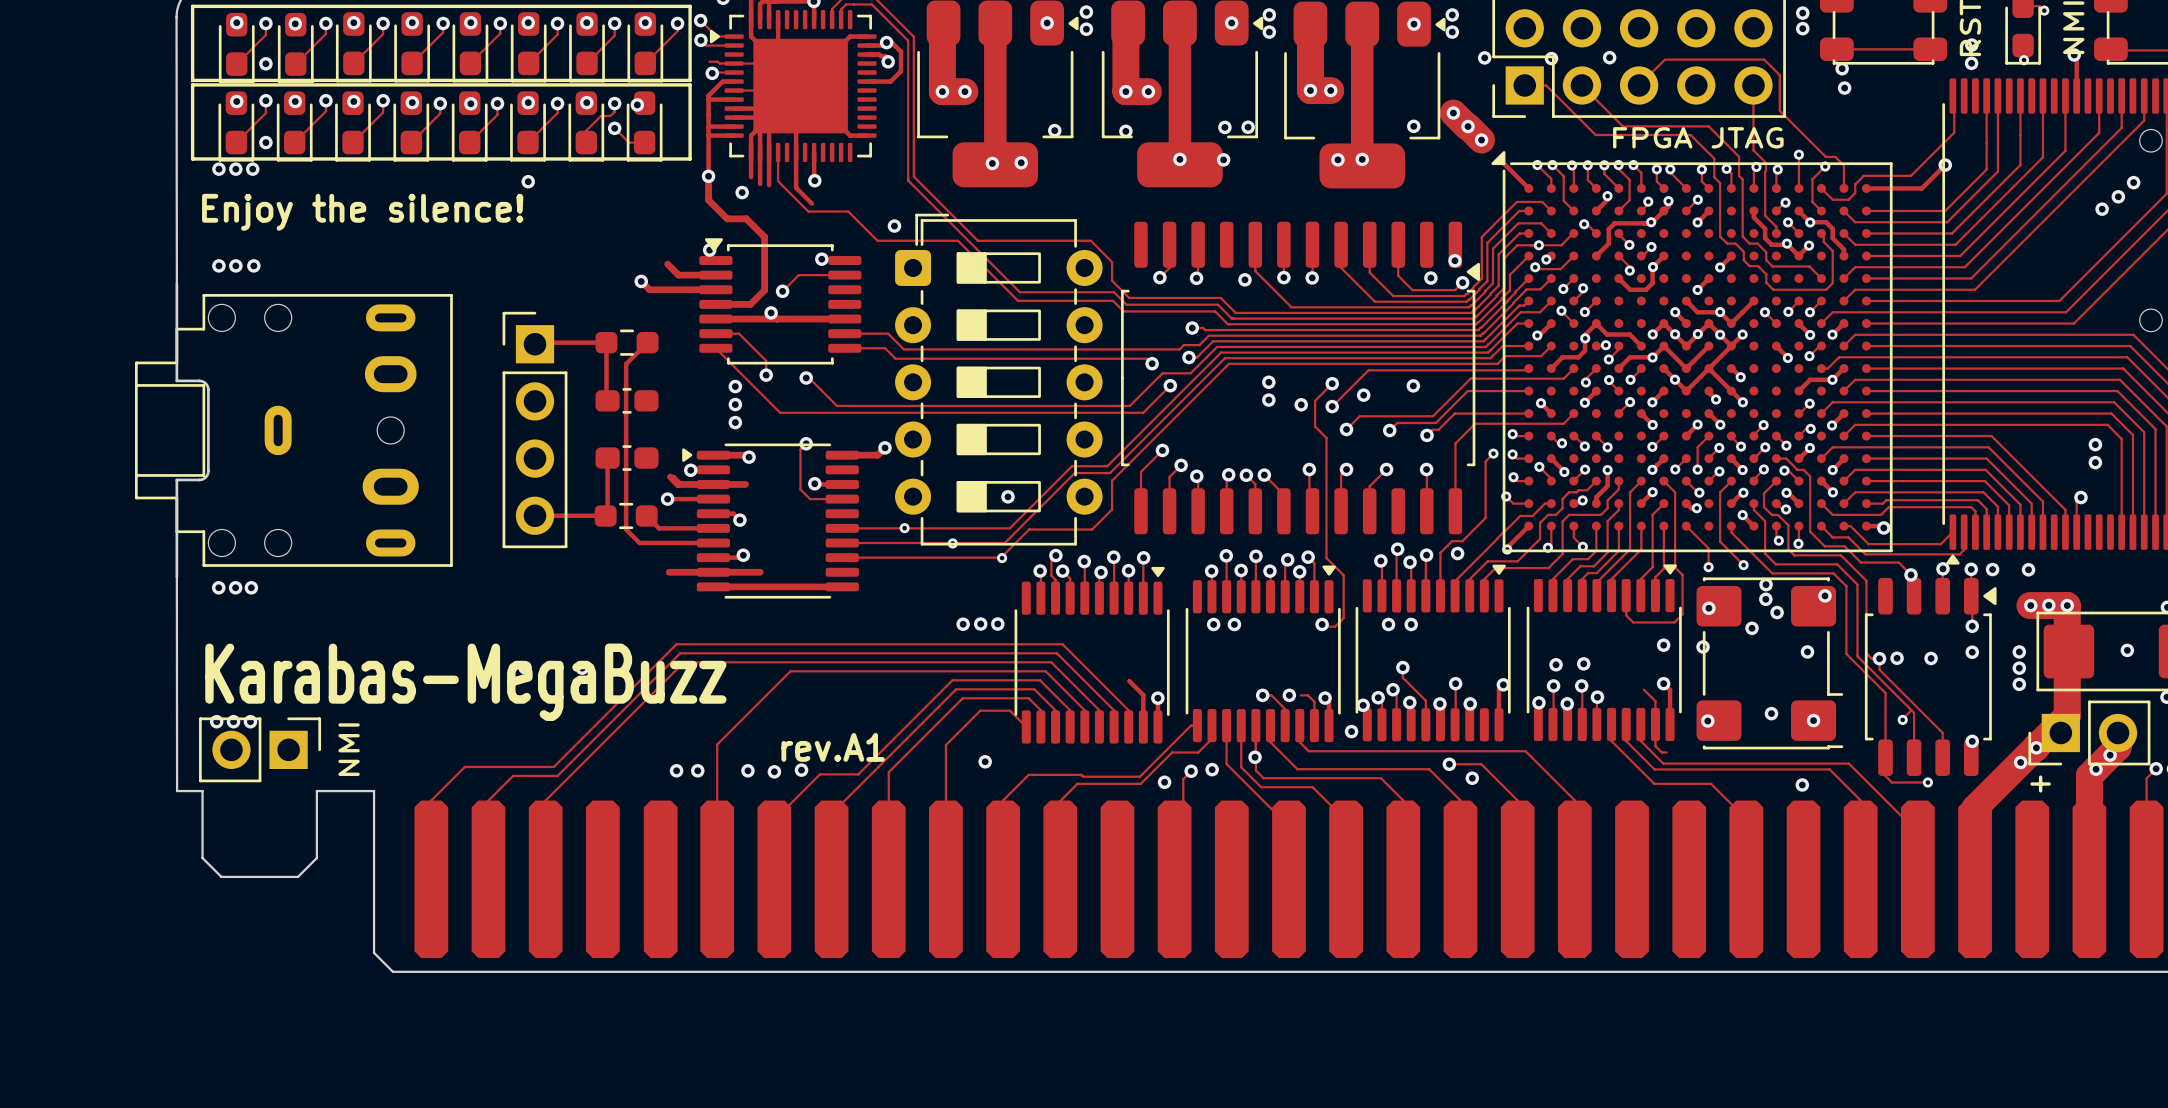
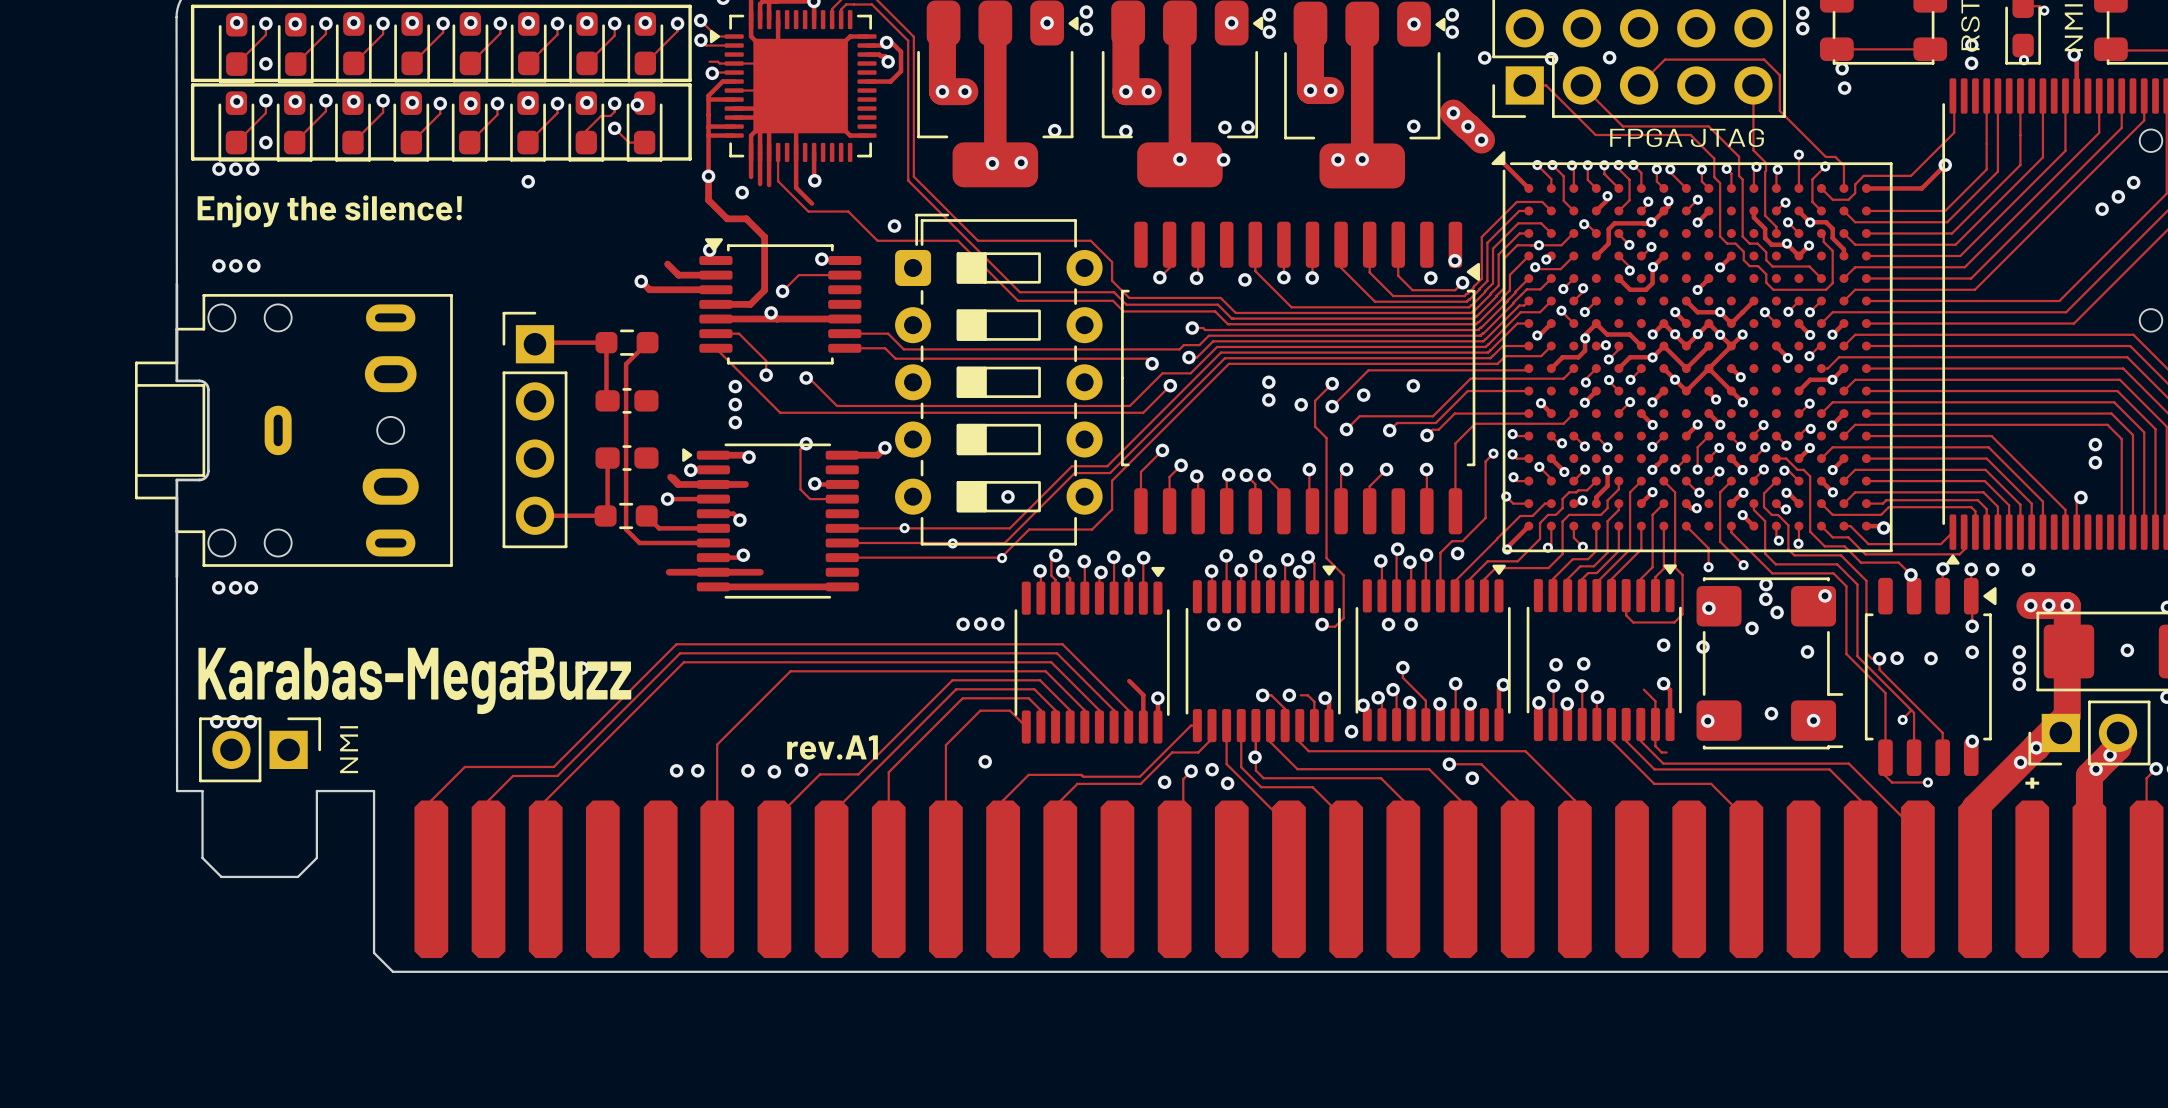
via: none -> (1227, 783)
via: (1802, 784) -> none

